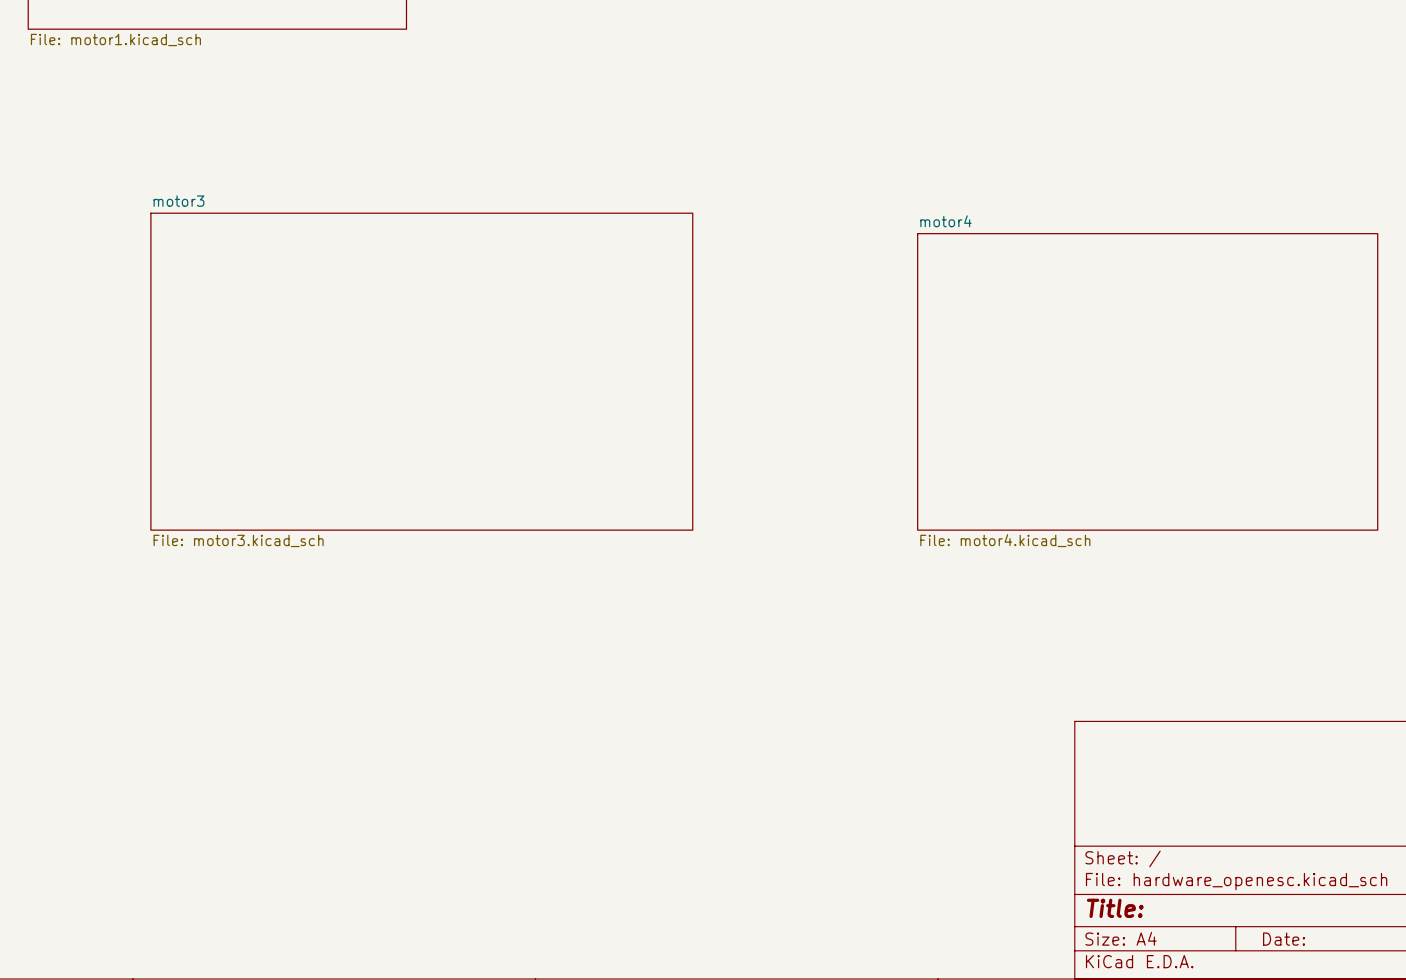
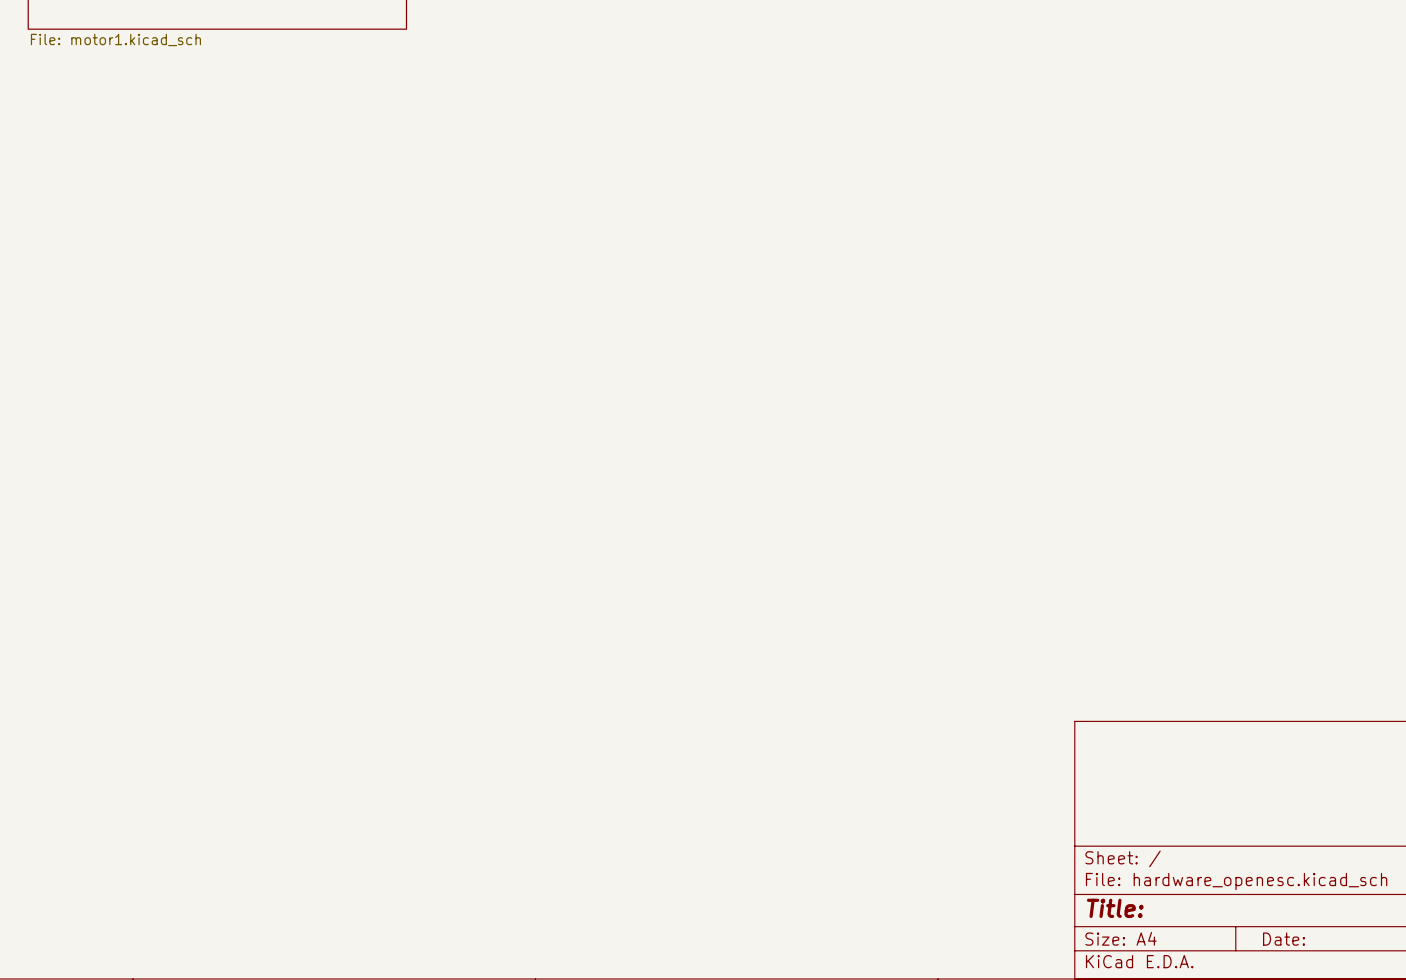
sheet motor3: File: motor3.kicad_sch (421, 371) -> none
sheet motor4: File: motor4.kicad_sch (1147, 381) -> none

